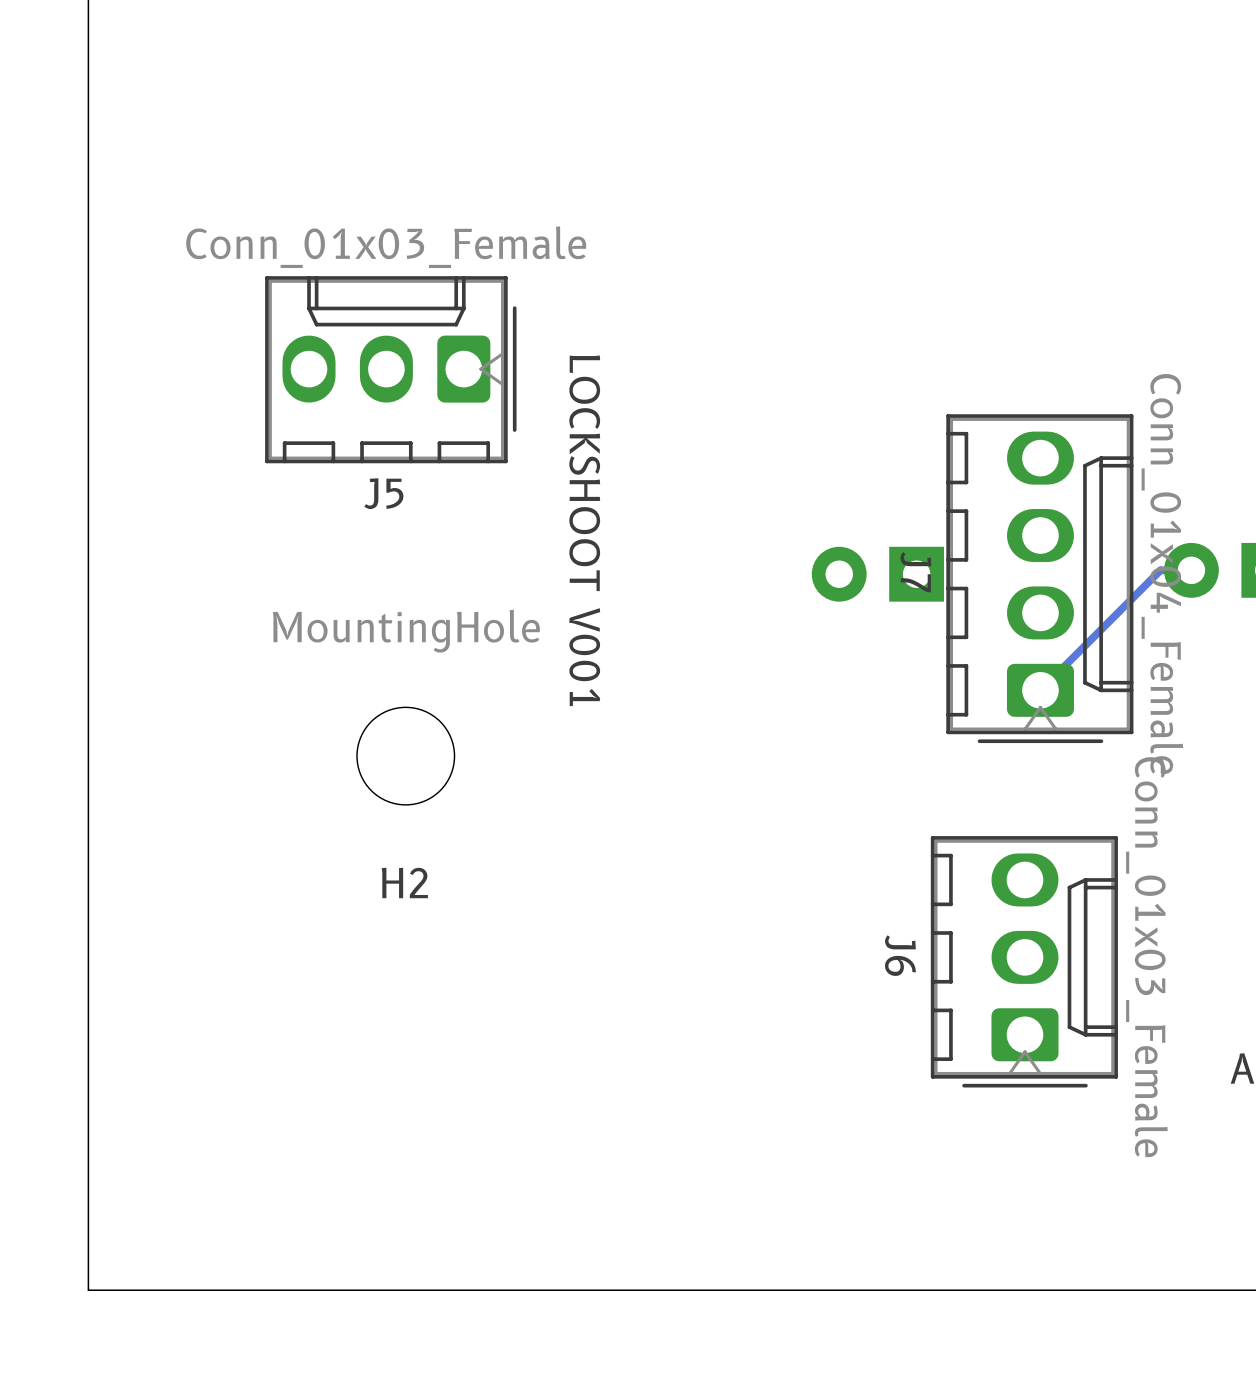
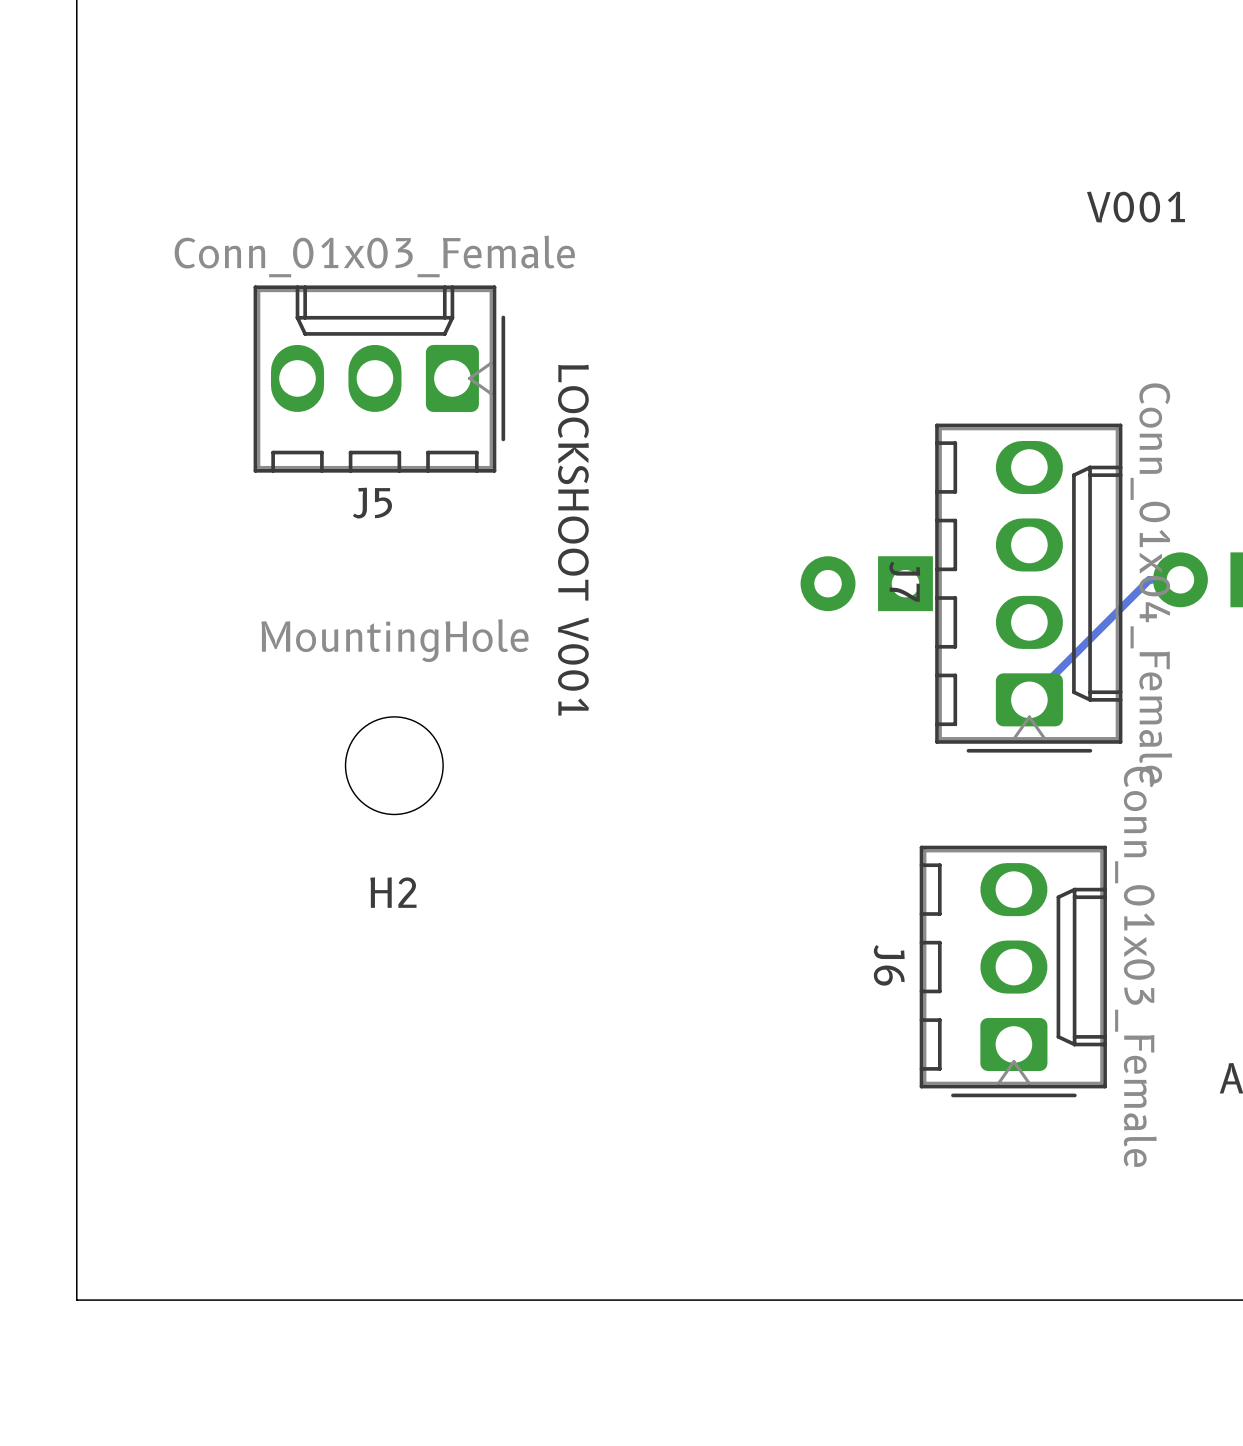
text: none -> V001 (1135, 207)

